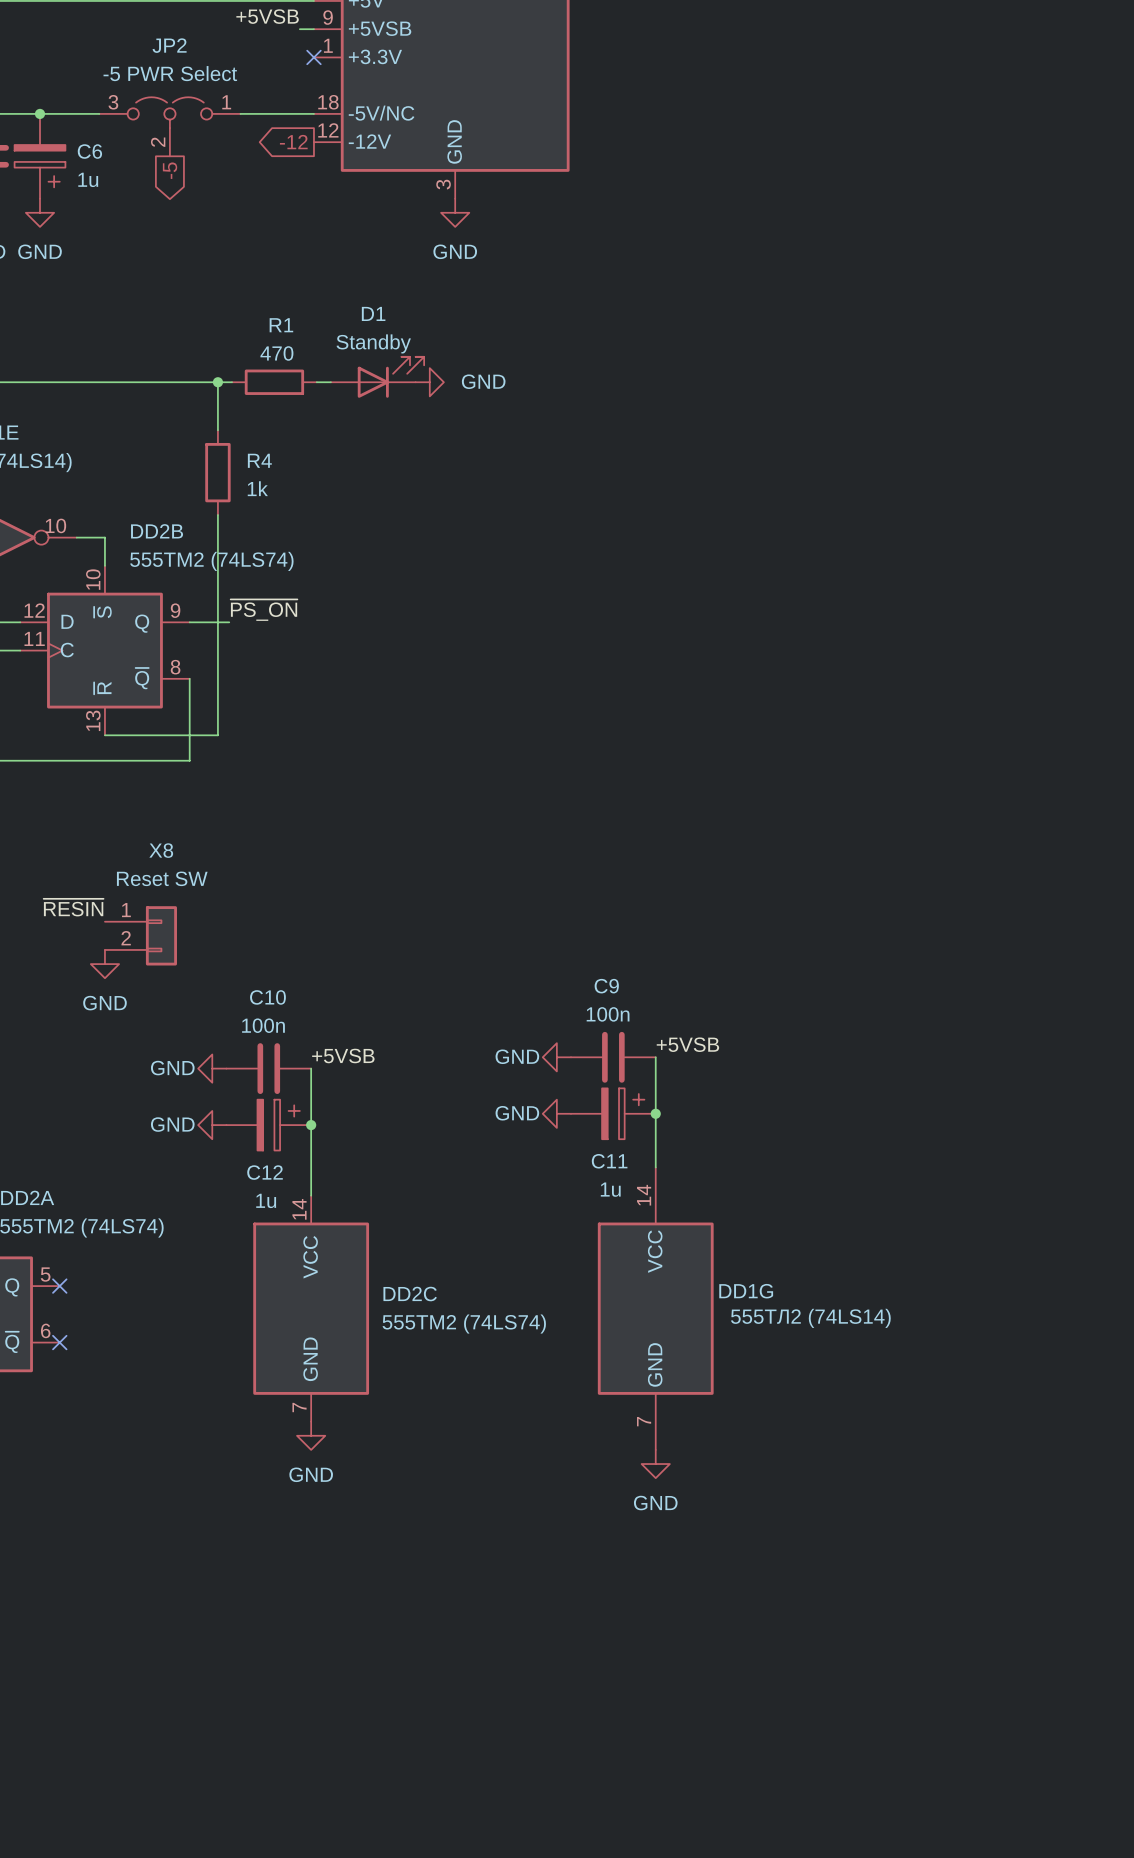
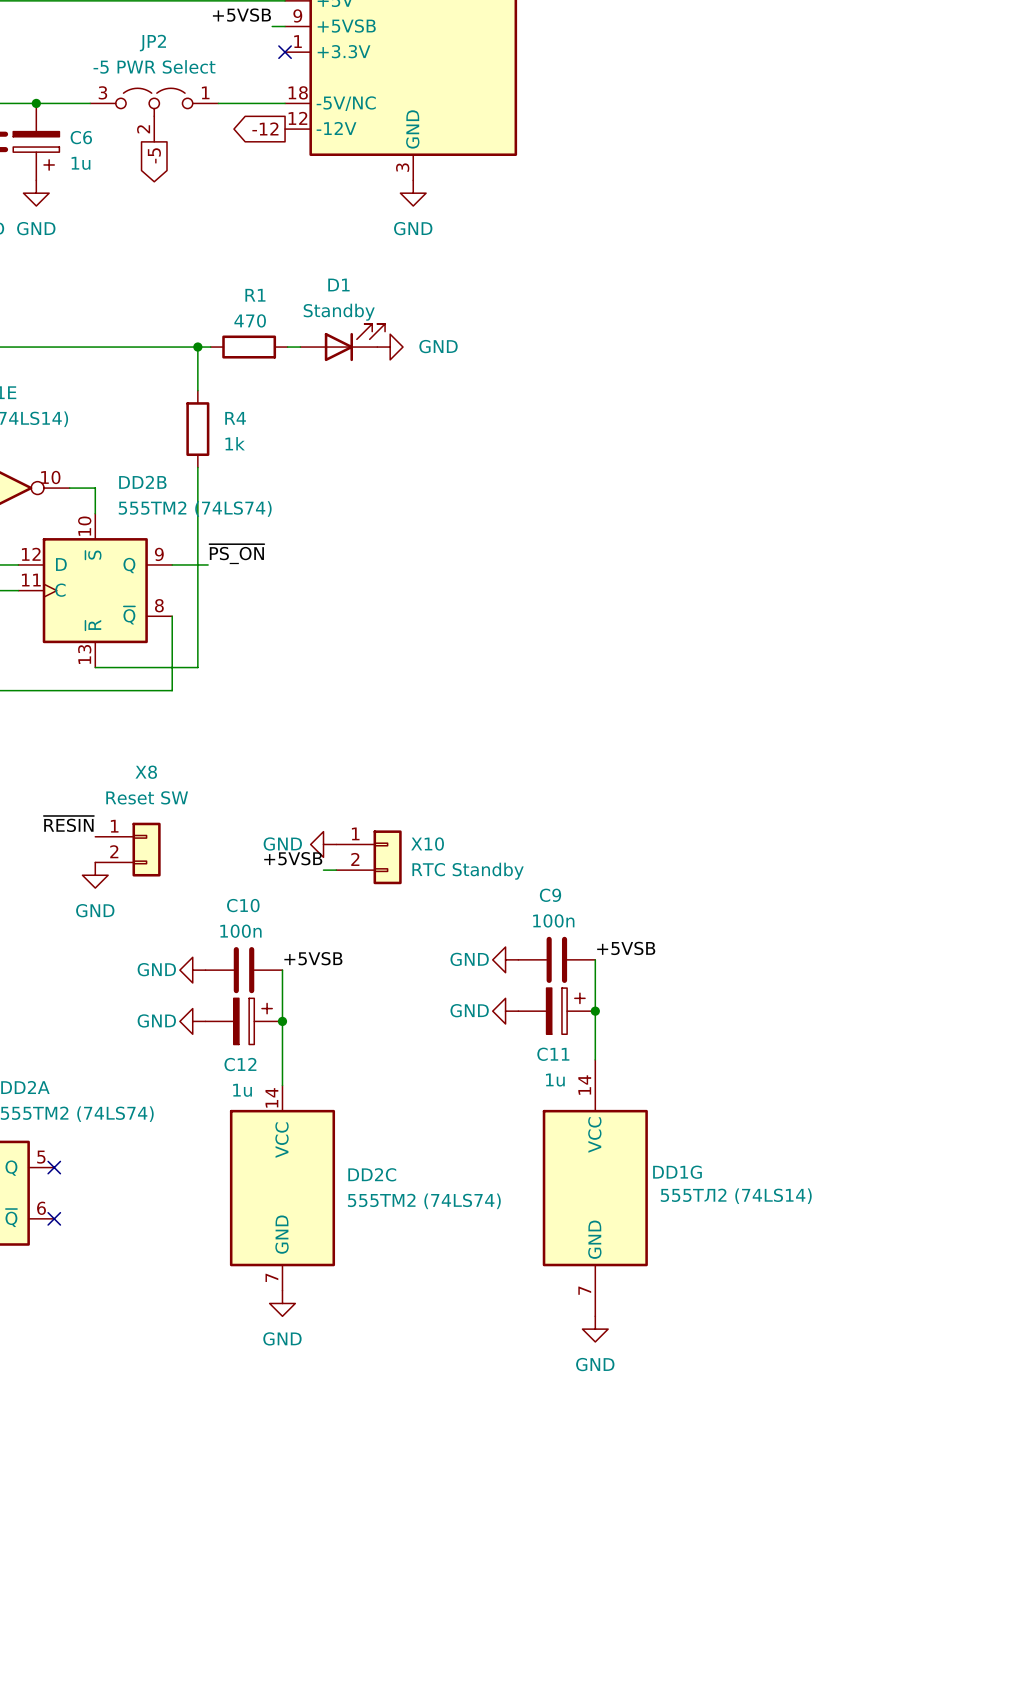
power symbol: none -> GND (323, 844)
X10: none -> RTC Standby (369, 857)
label: none -> +5VSB (293, 858)
wire: none -> (323, 870) (336, 870)

